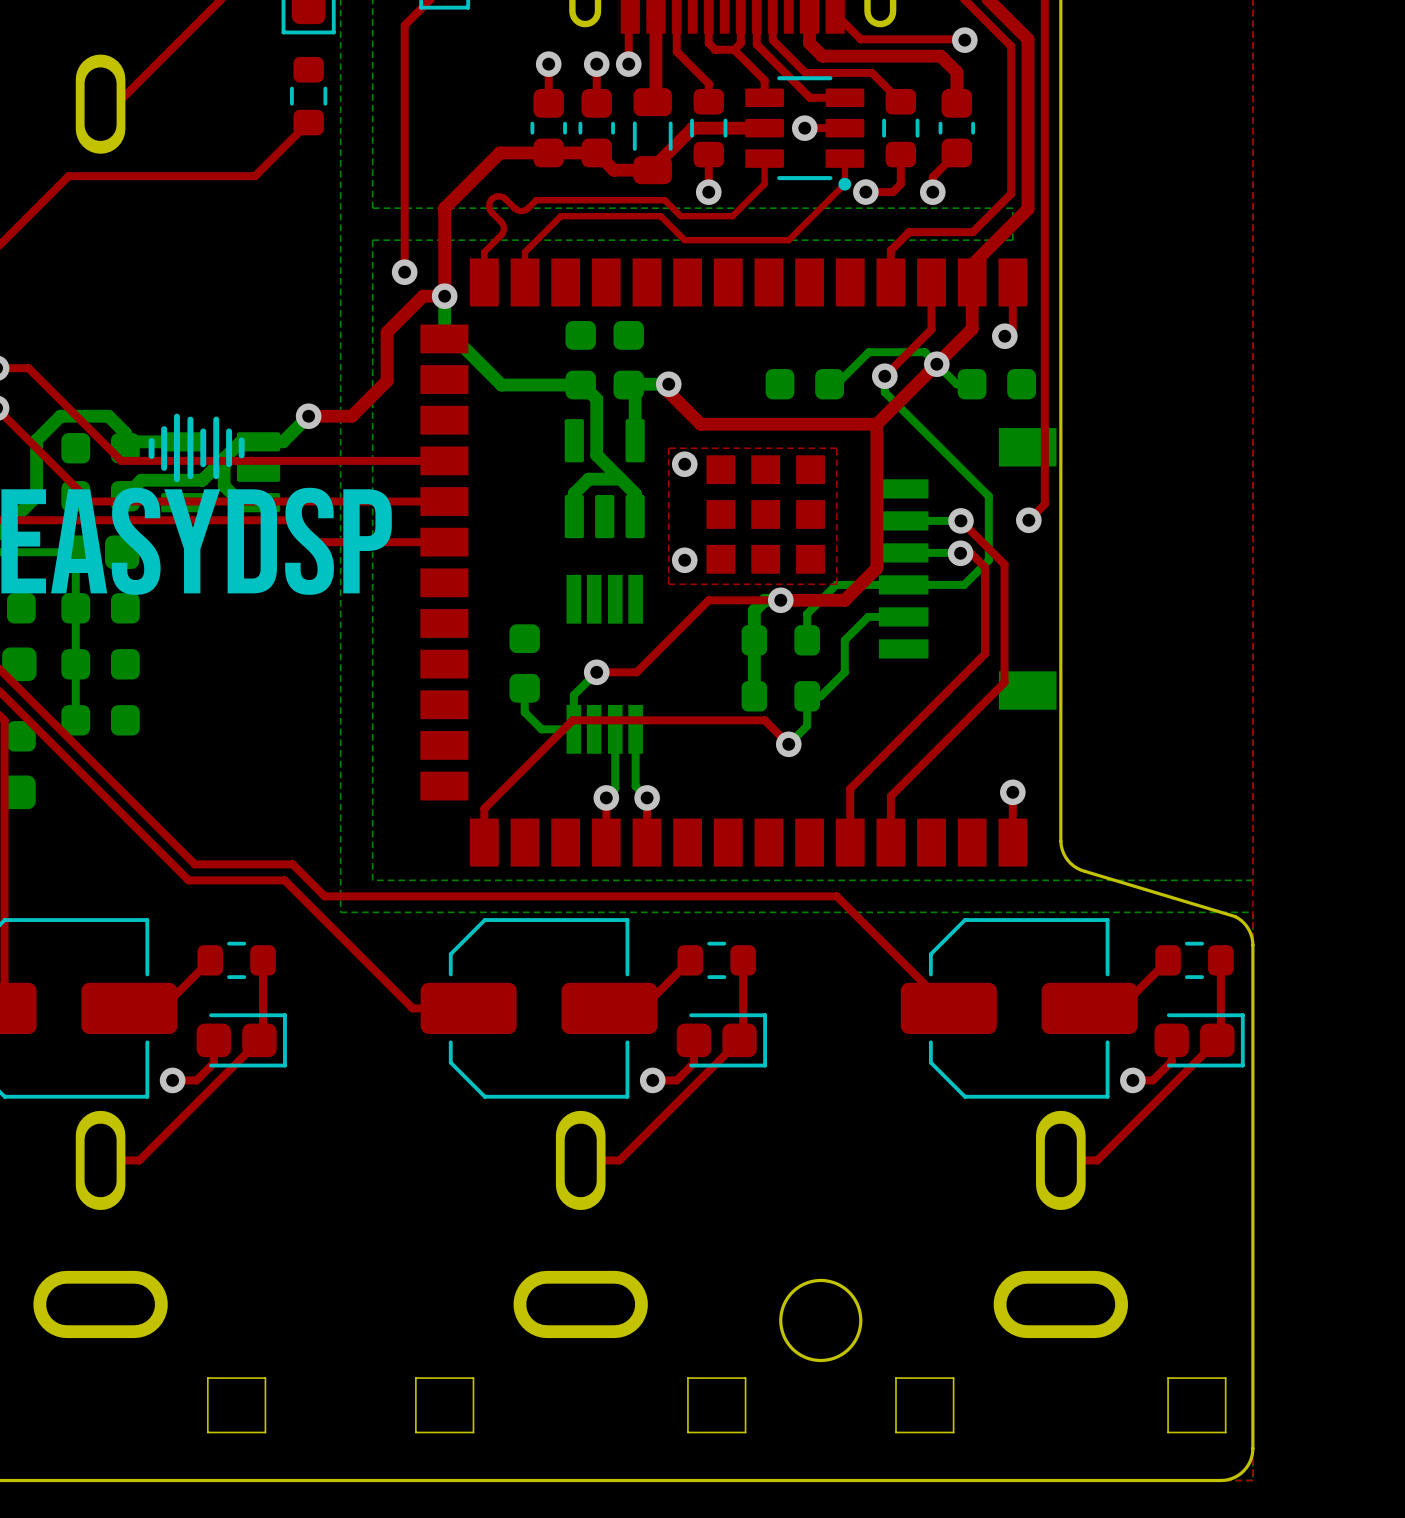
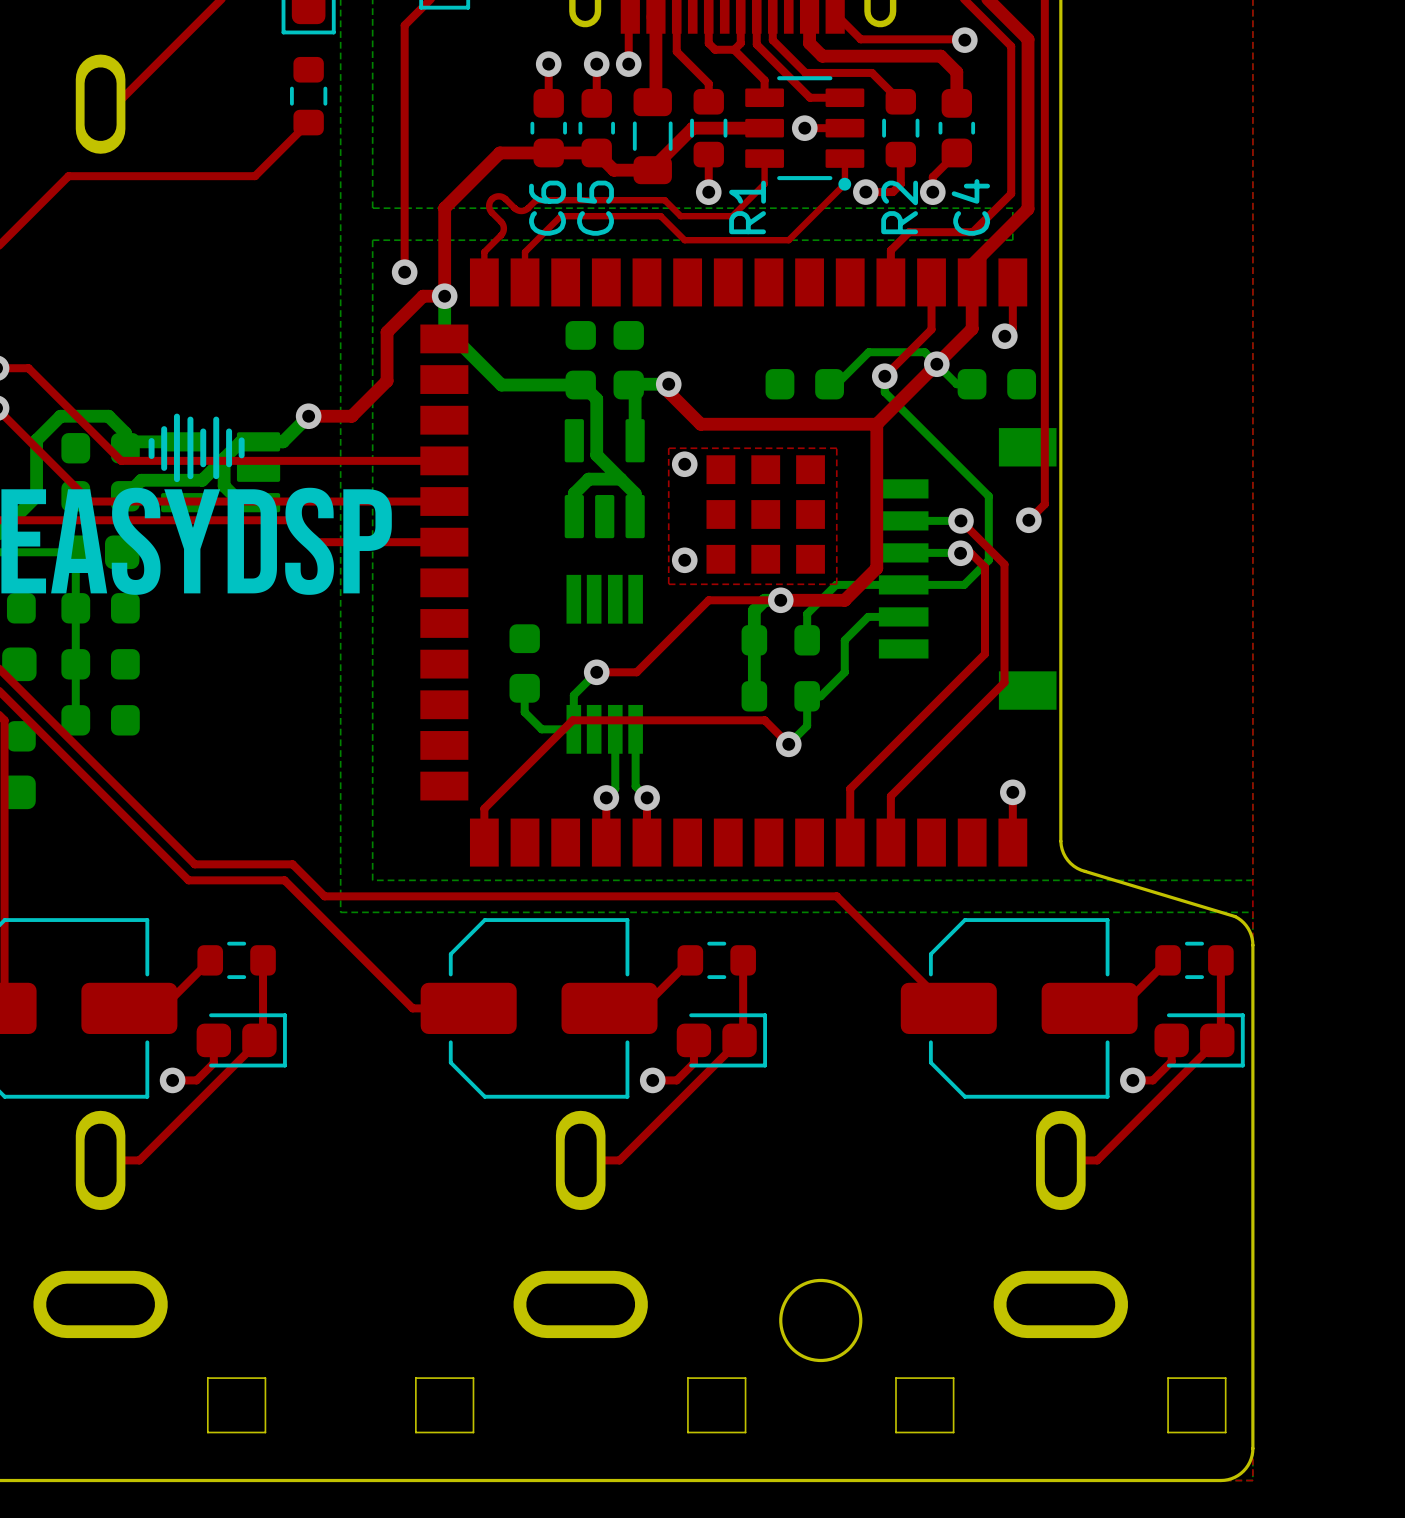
R1 name: none -> R1 (747, 207)
R2 name: none -> R2 (899, 207)
C4 name: none -> C4 (970, 207)
C6 name: none -> C6 (547, 208)
C5 name: none -> C5 (595, 208)

